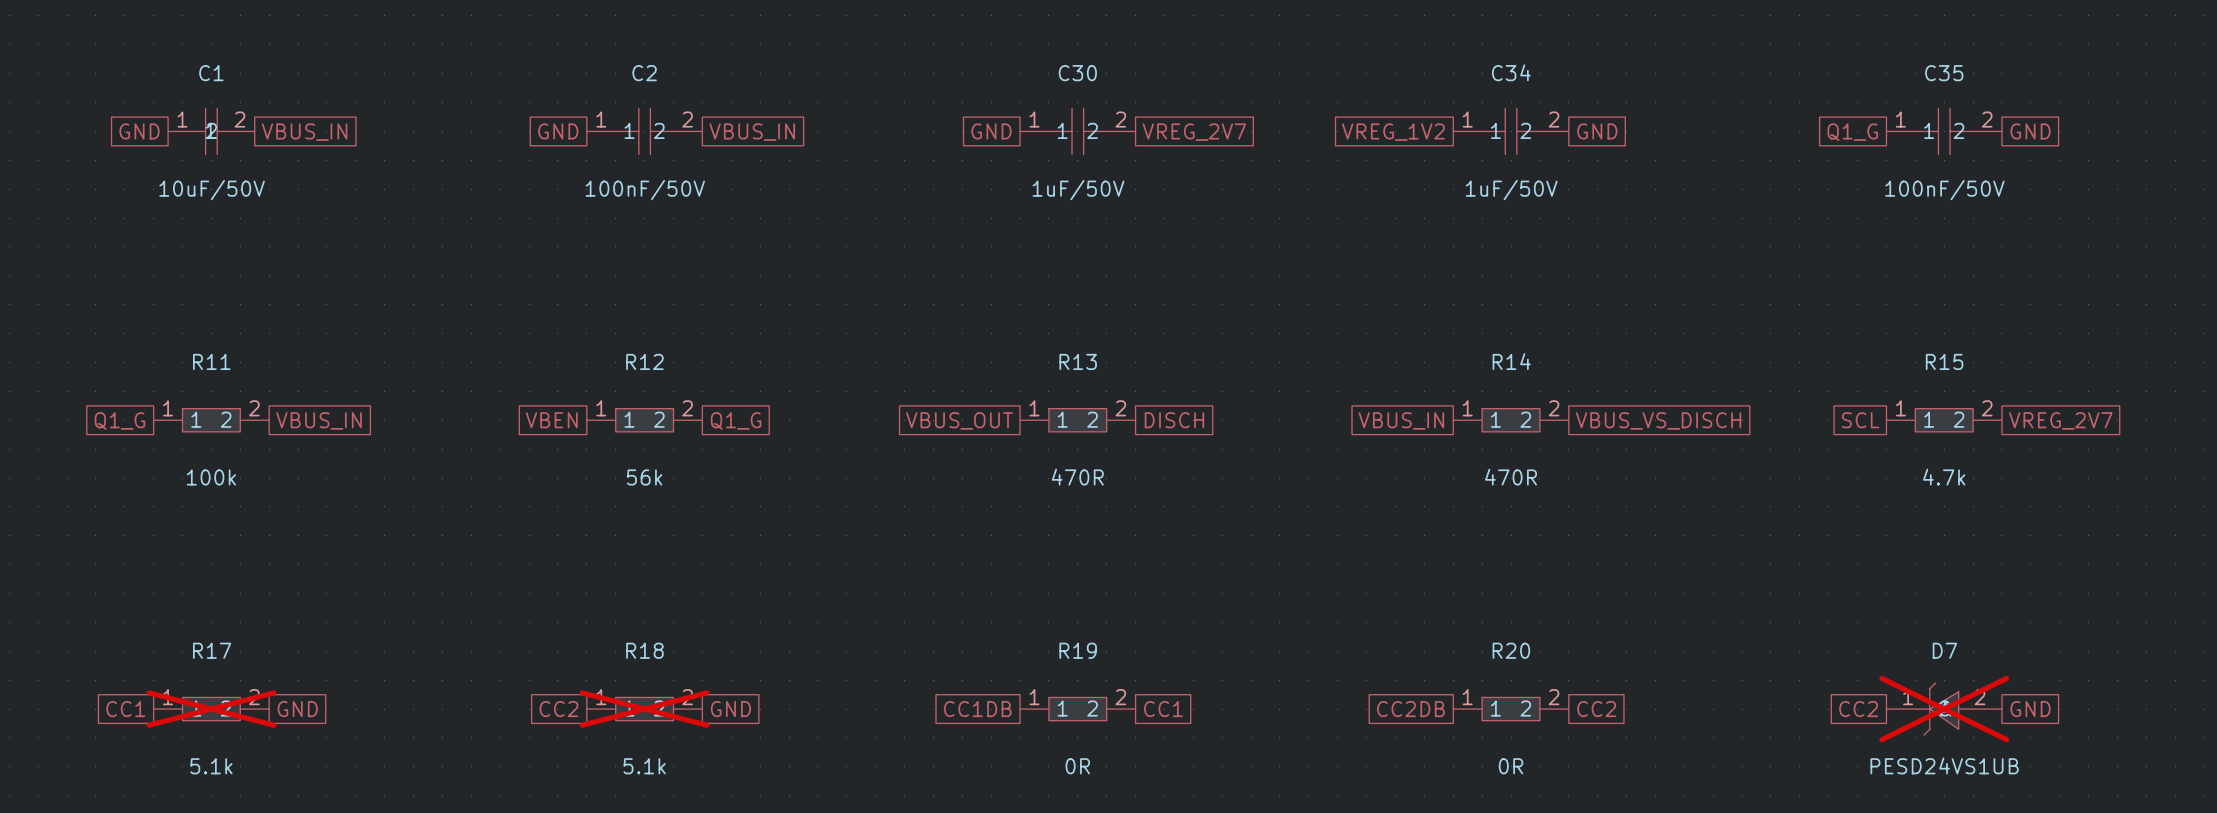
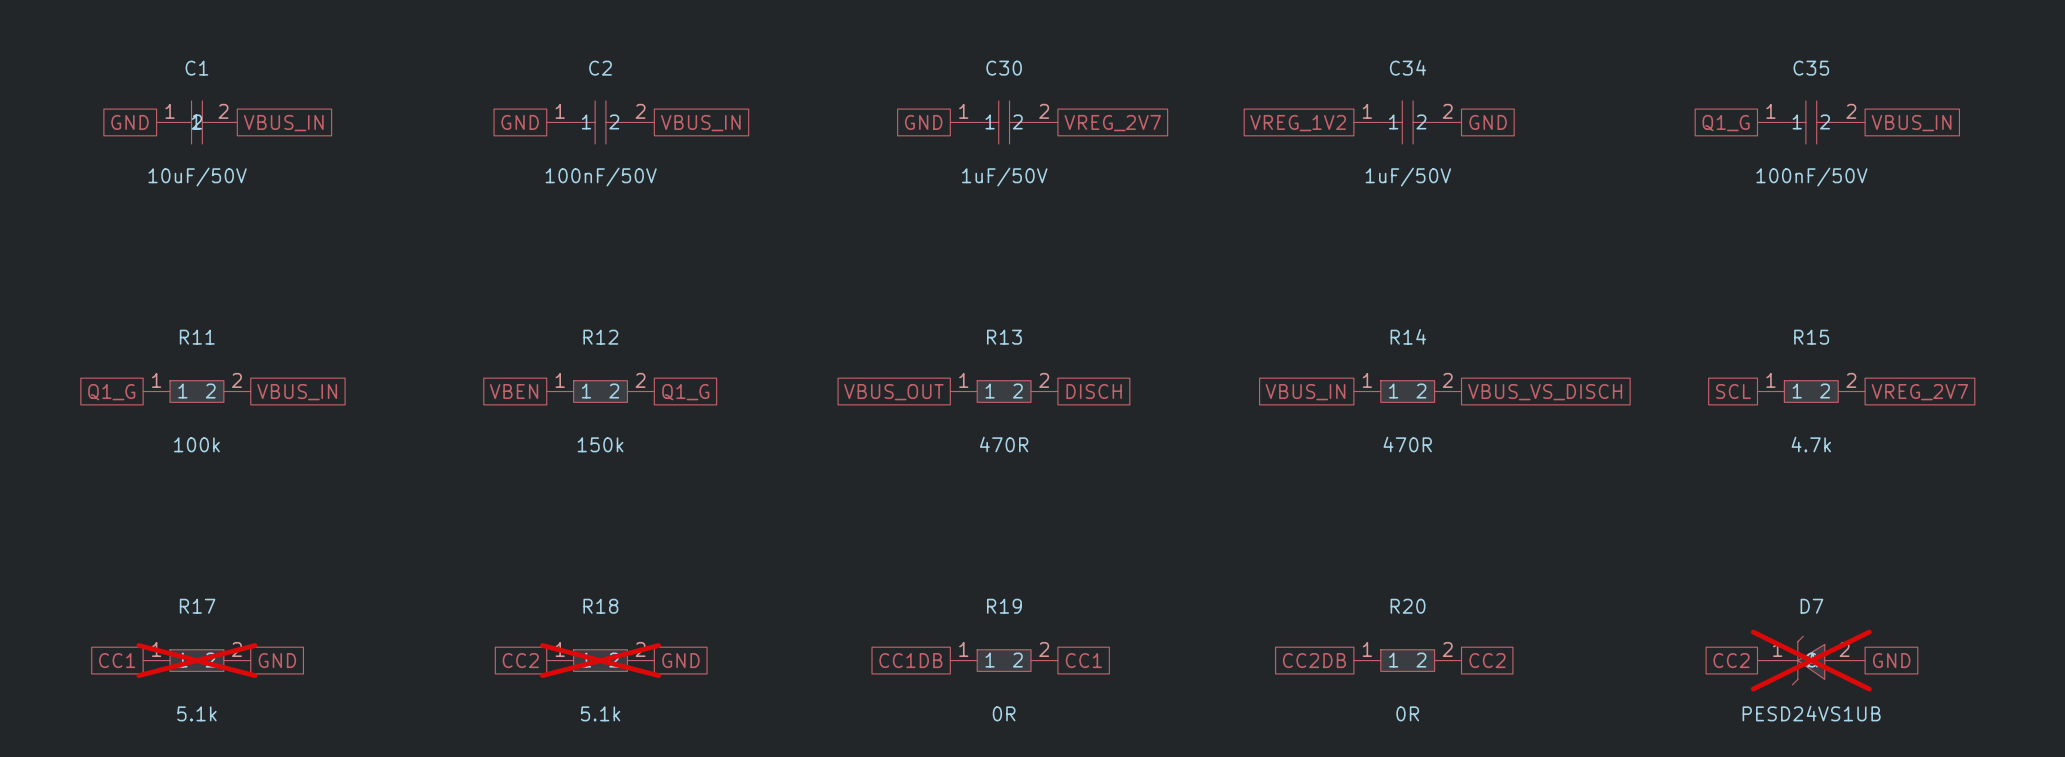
global label: GND (2030, 131) -> VBUS_IN (1911, 123)
R12 value: 56k (644, 477) -> 150k (600, 444)

